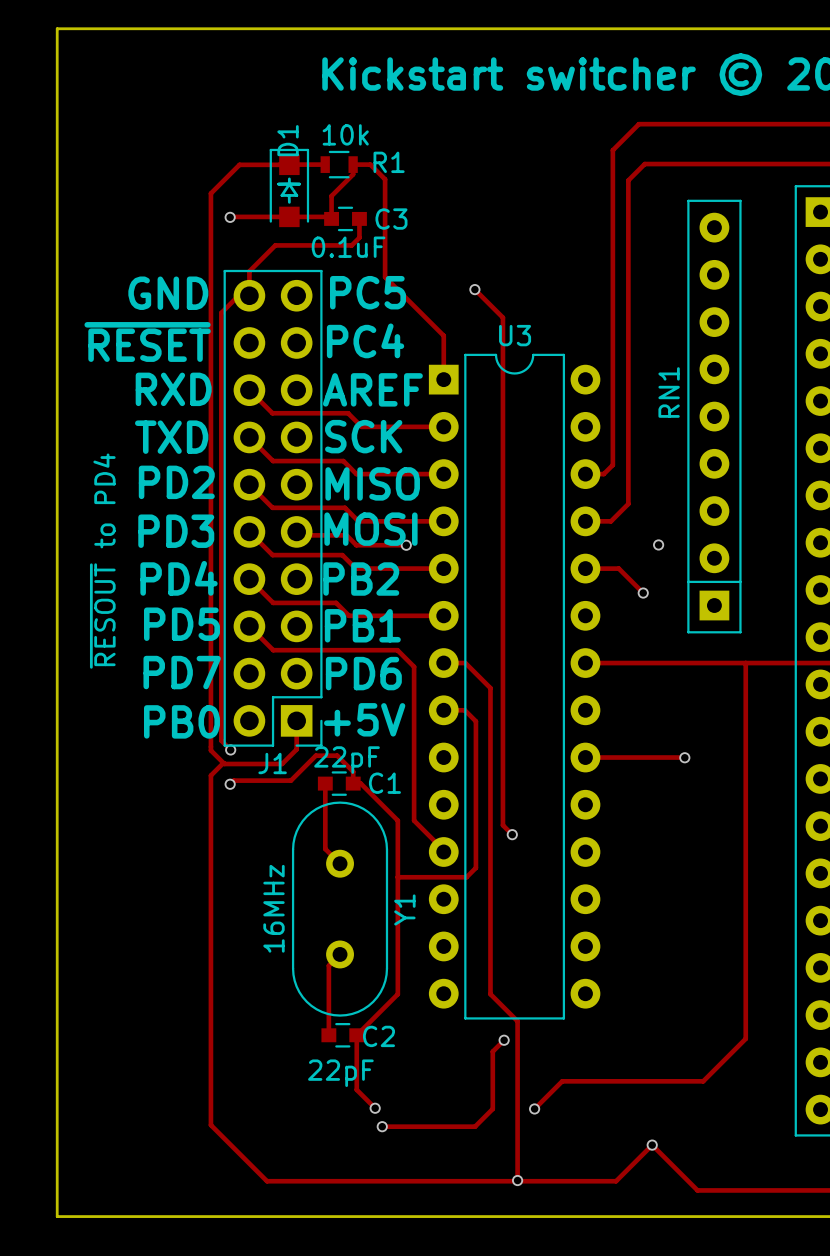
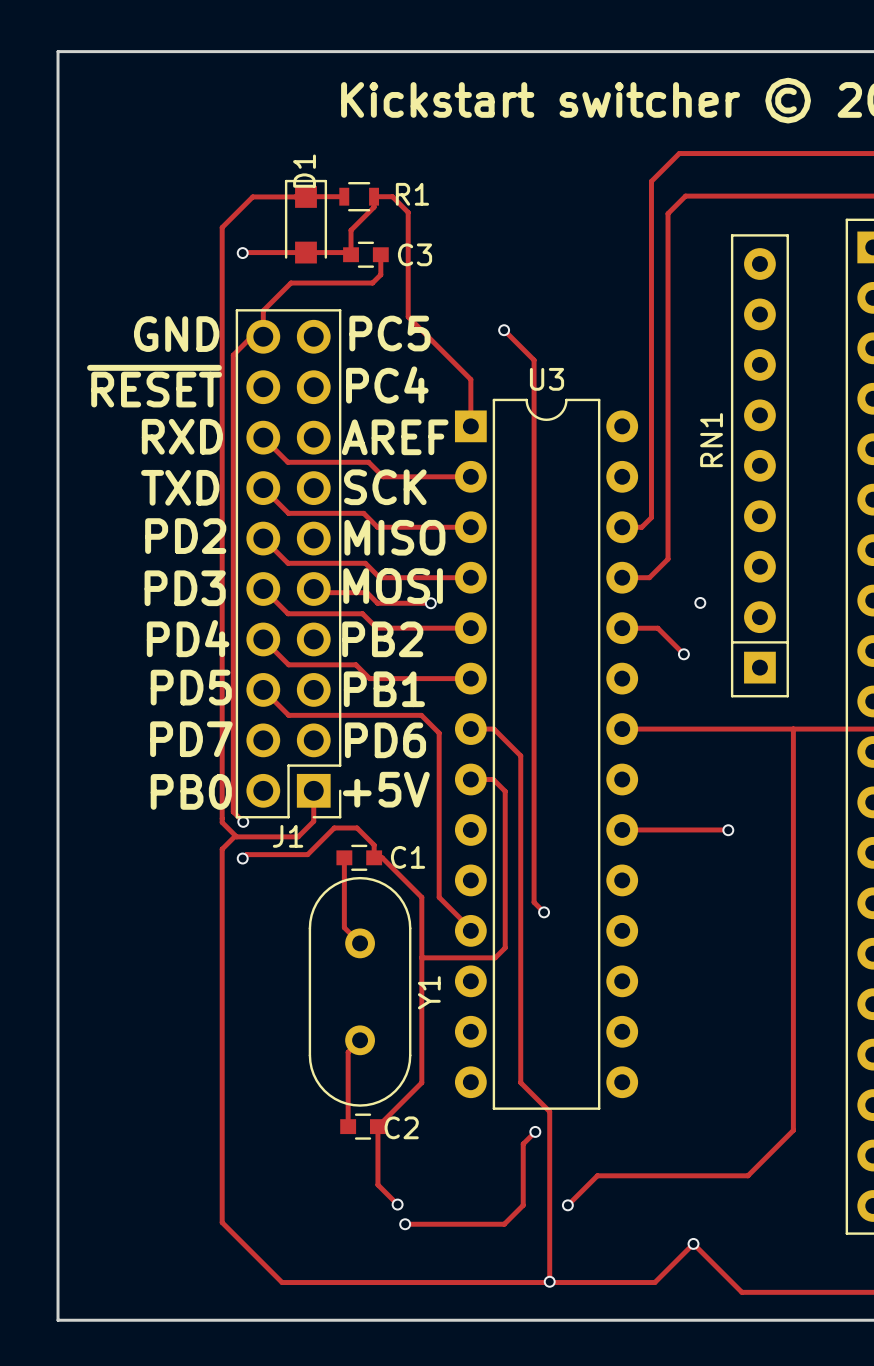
text: 10k (345, 134) -> none
line: (289, 178) (289, 183) (299, 184) (278, 184) (289, 183) (281, 195) (296, 195) (289, 184) -> none
line: (289, 195) (289, 202) -> none
text: 0.1uF (348, 247) -> none
text: ~{RESOUT} to PD4 (102, 561) -> none
text: 22pF (347, 760) -> none
text: 16MHz (273, 908) -> none
text: 22pF (340, 1073) -> none

